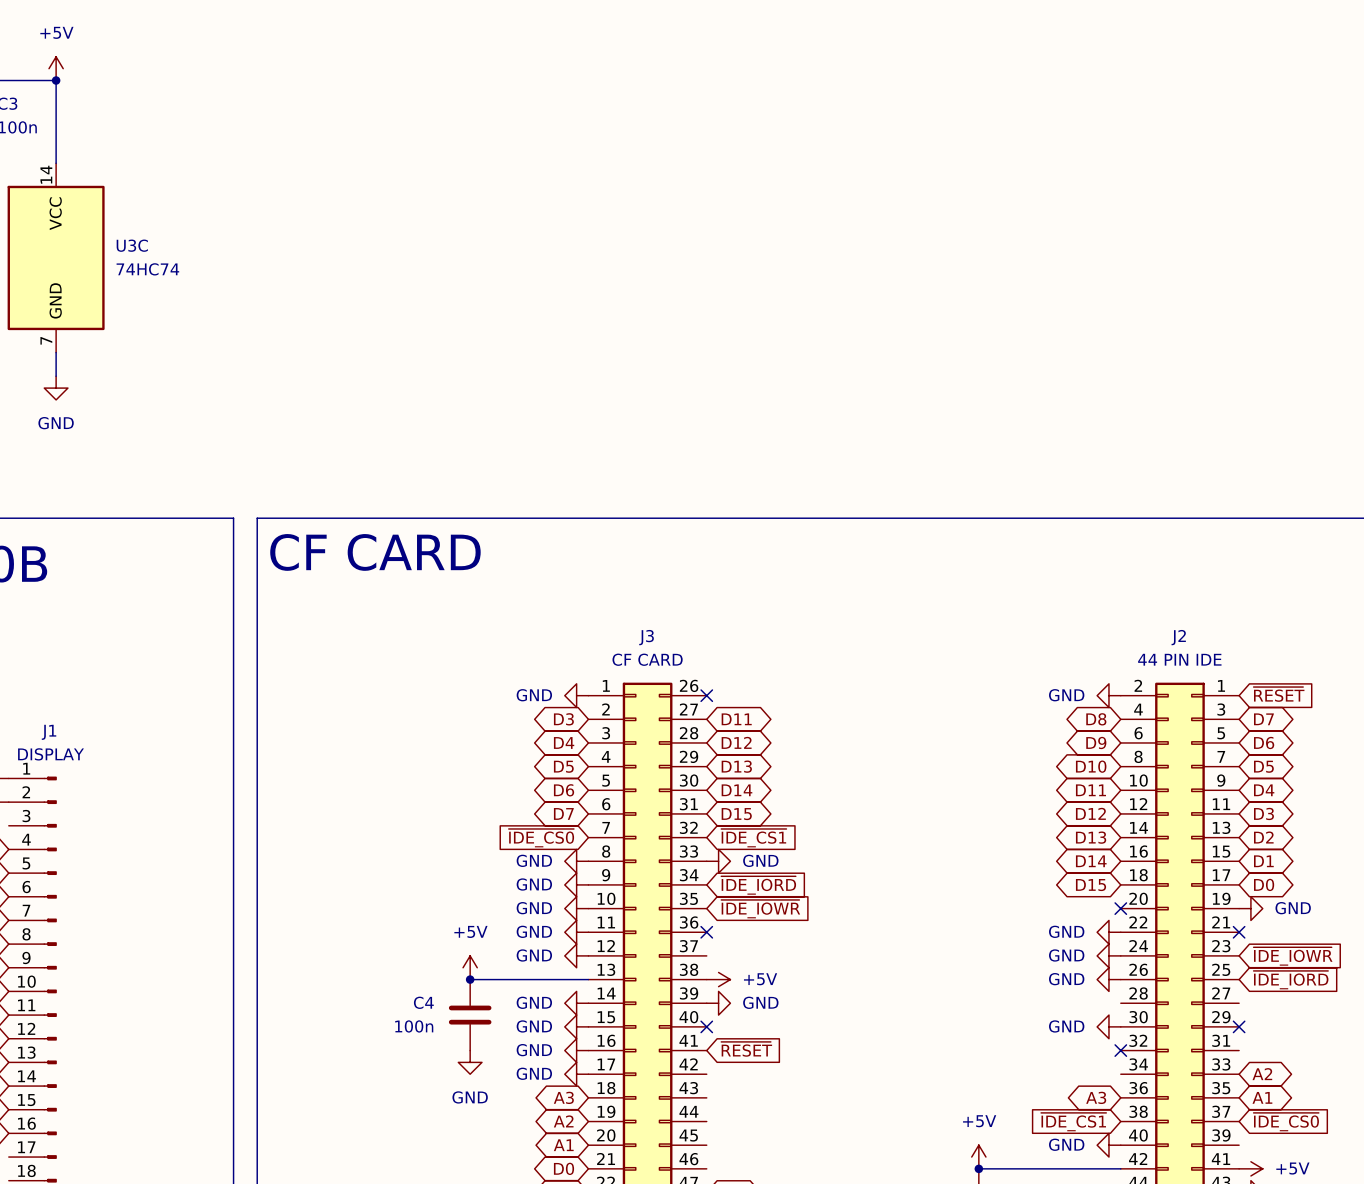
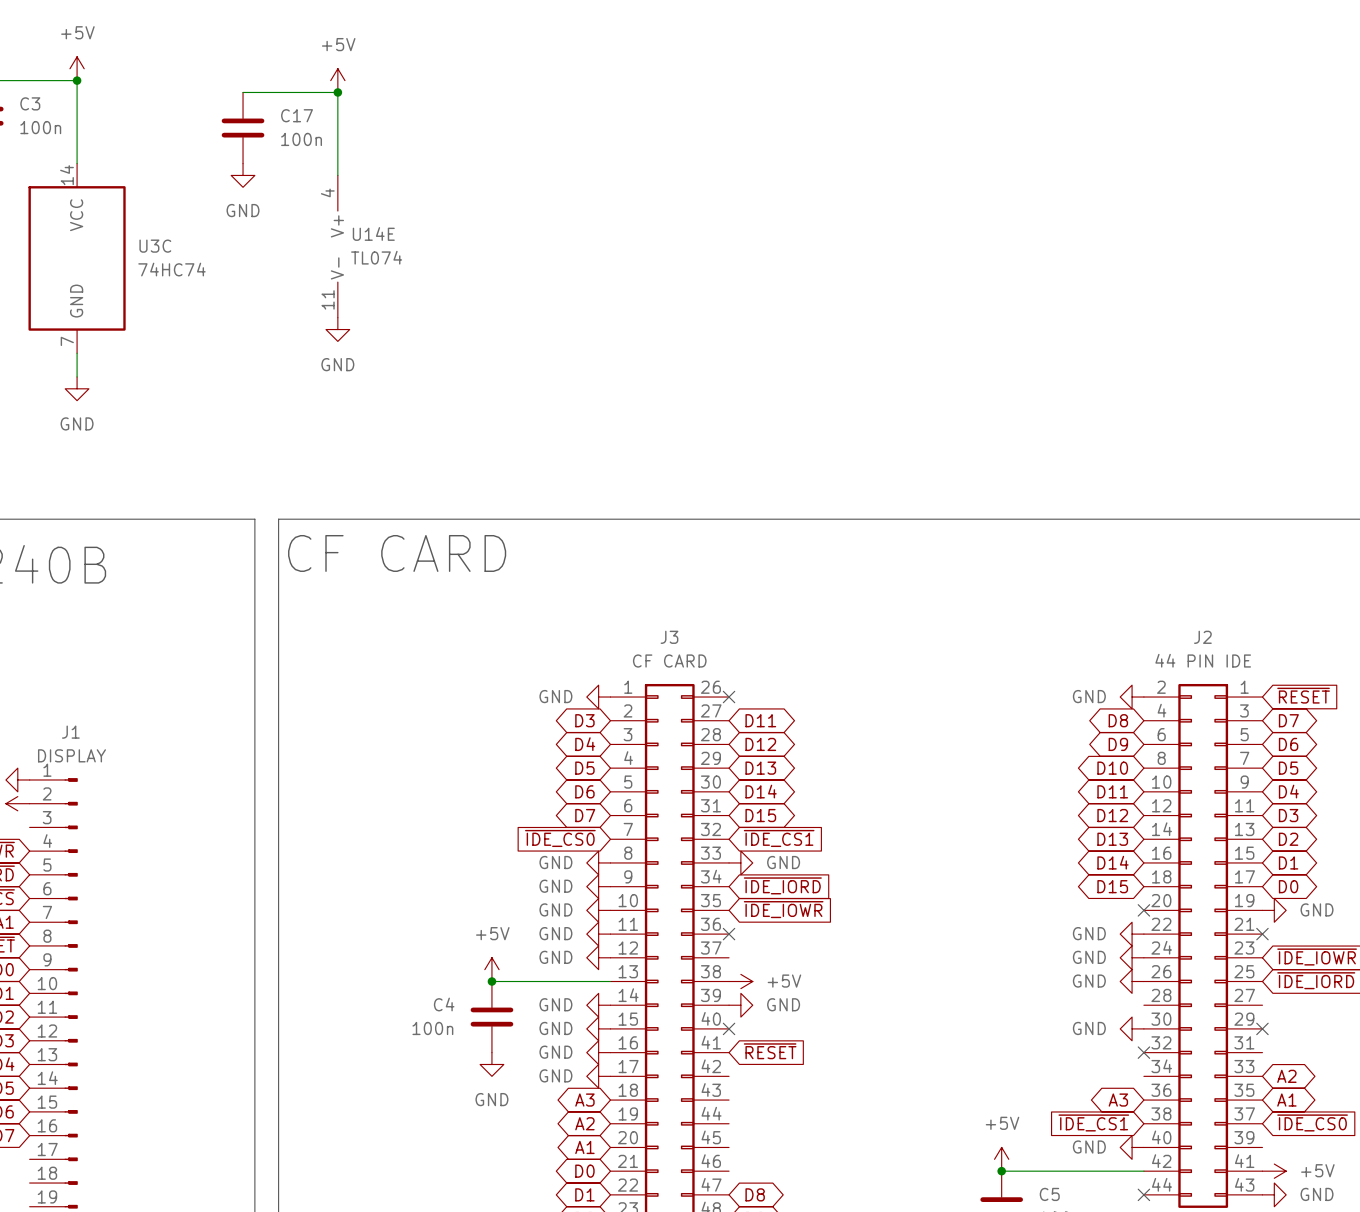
power symbol: none -> +5V (337, 80)
wire: none -> (243, 92) (337, 92) (337, 175)
junction: none -> (337, 92)
C17: none -> 100n (243, 128)
power symbol: none -> GND (243, 175)
U14E: none -> TL074 (337, 246)
power symbol: none -> GND (337, 329)

